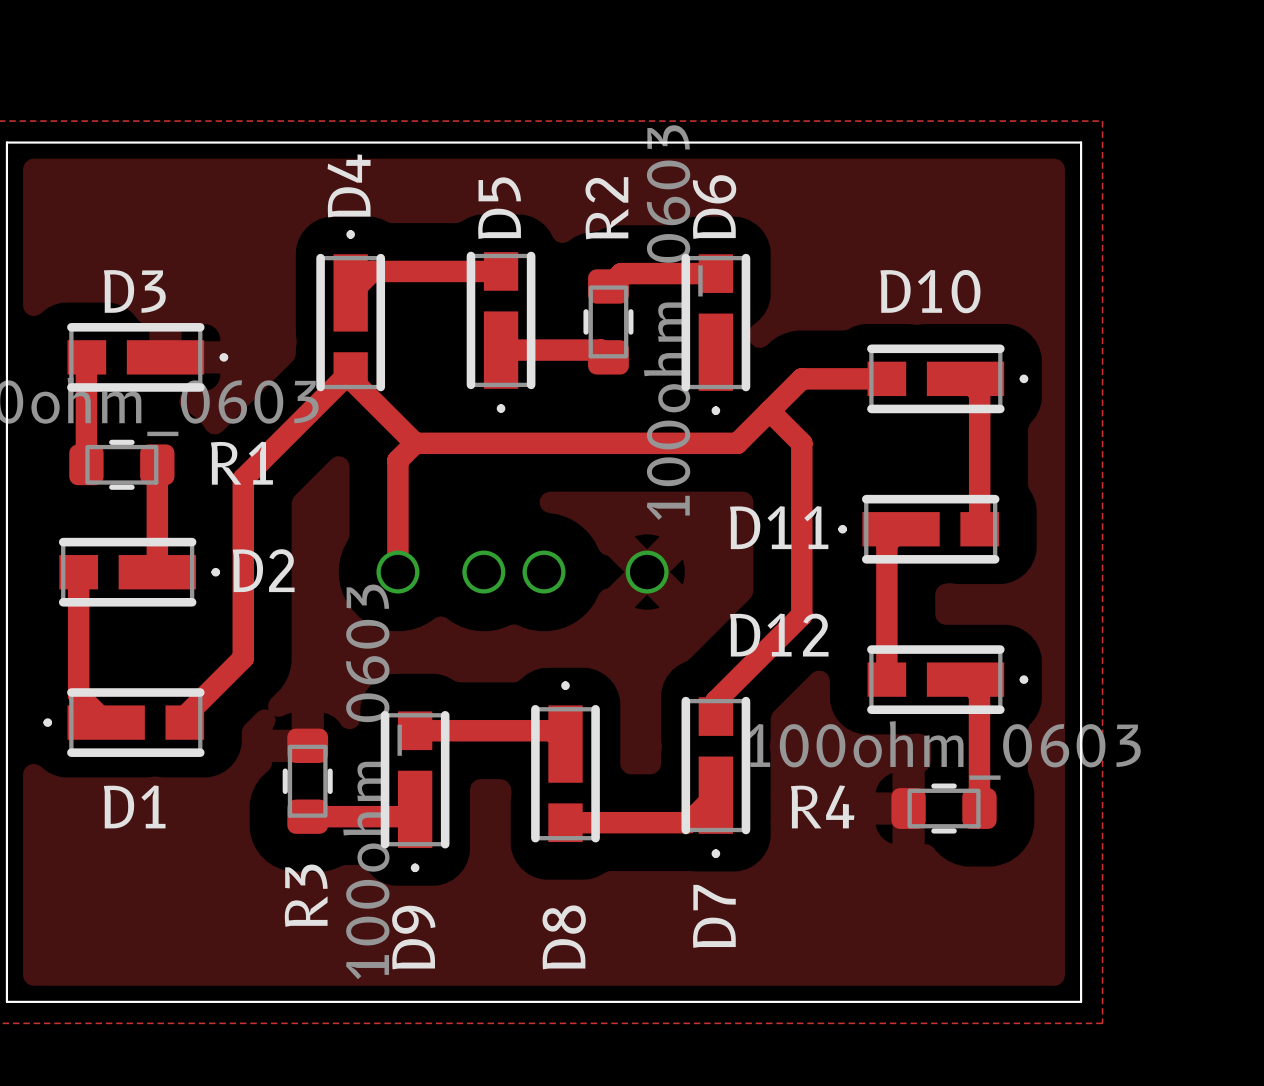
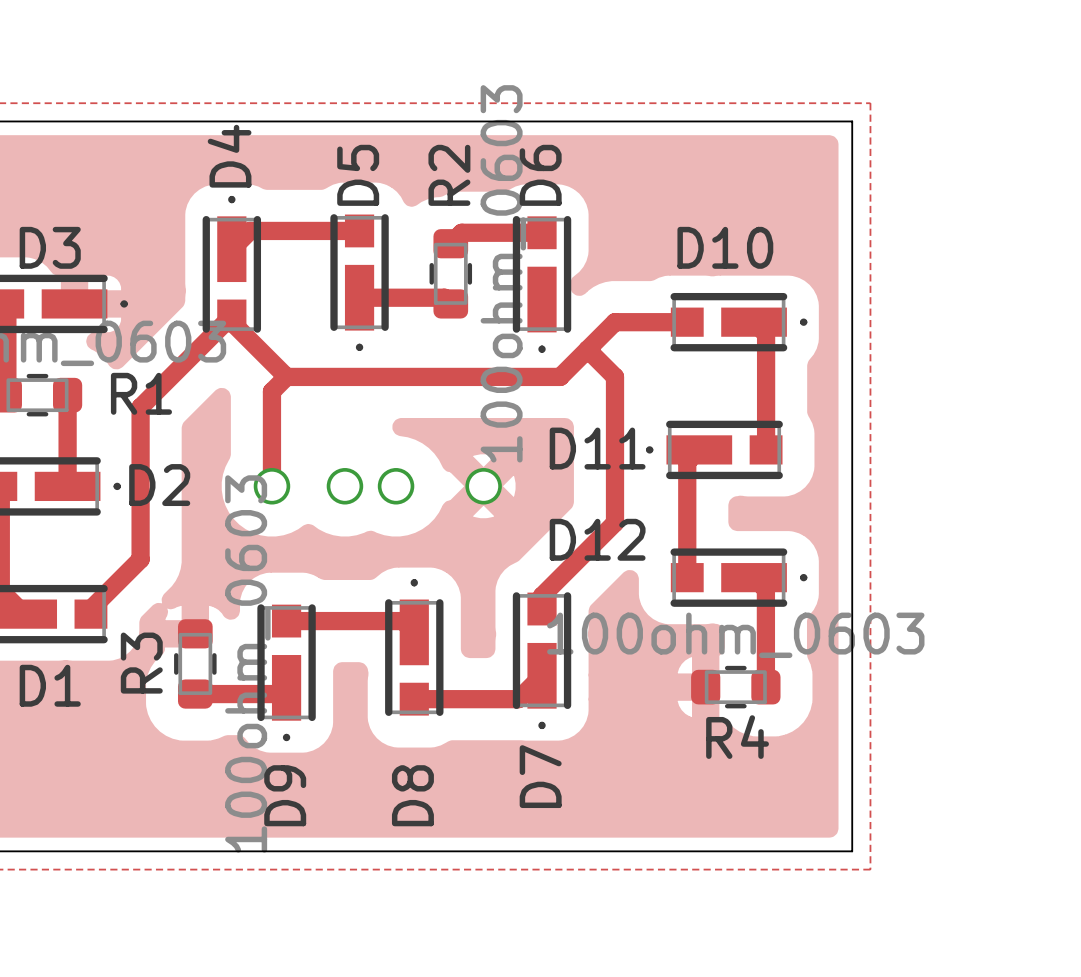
R4 name position: R4 (822, 806) -> R4 (737, 737)
R3 name position: R3 (306, 895) -> R3 (141, 663)

